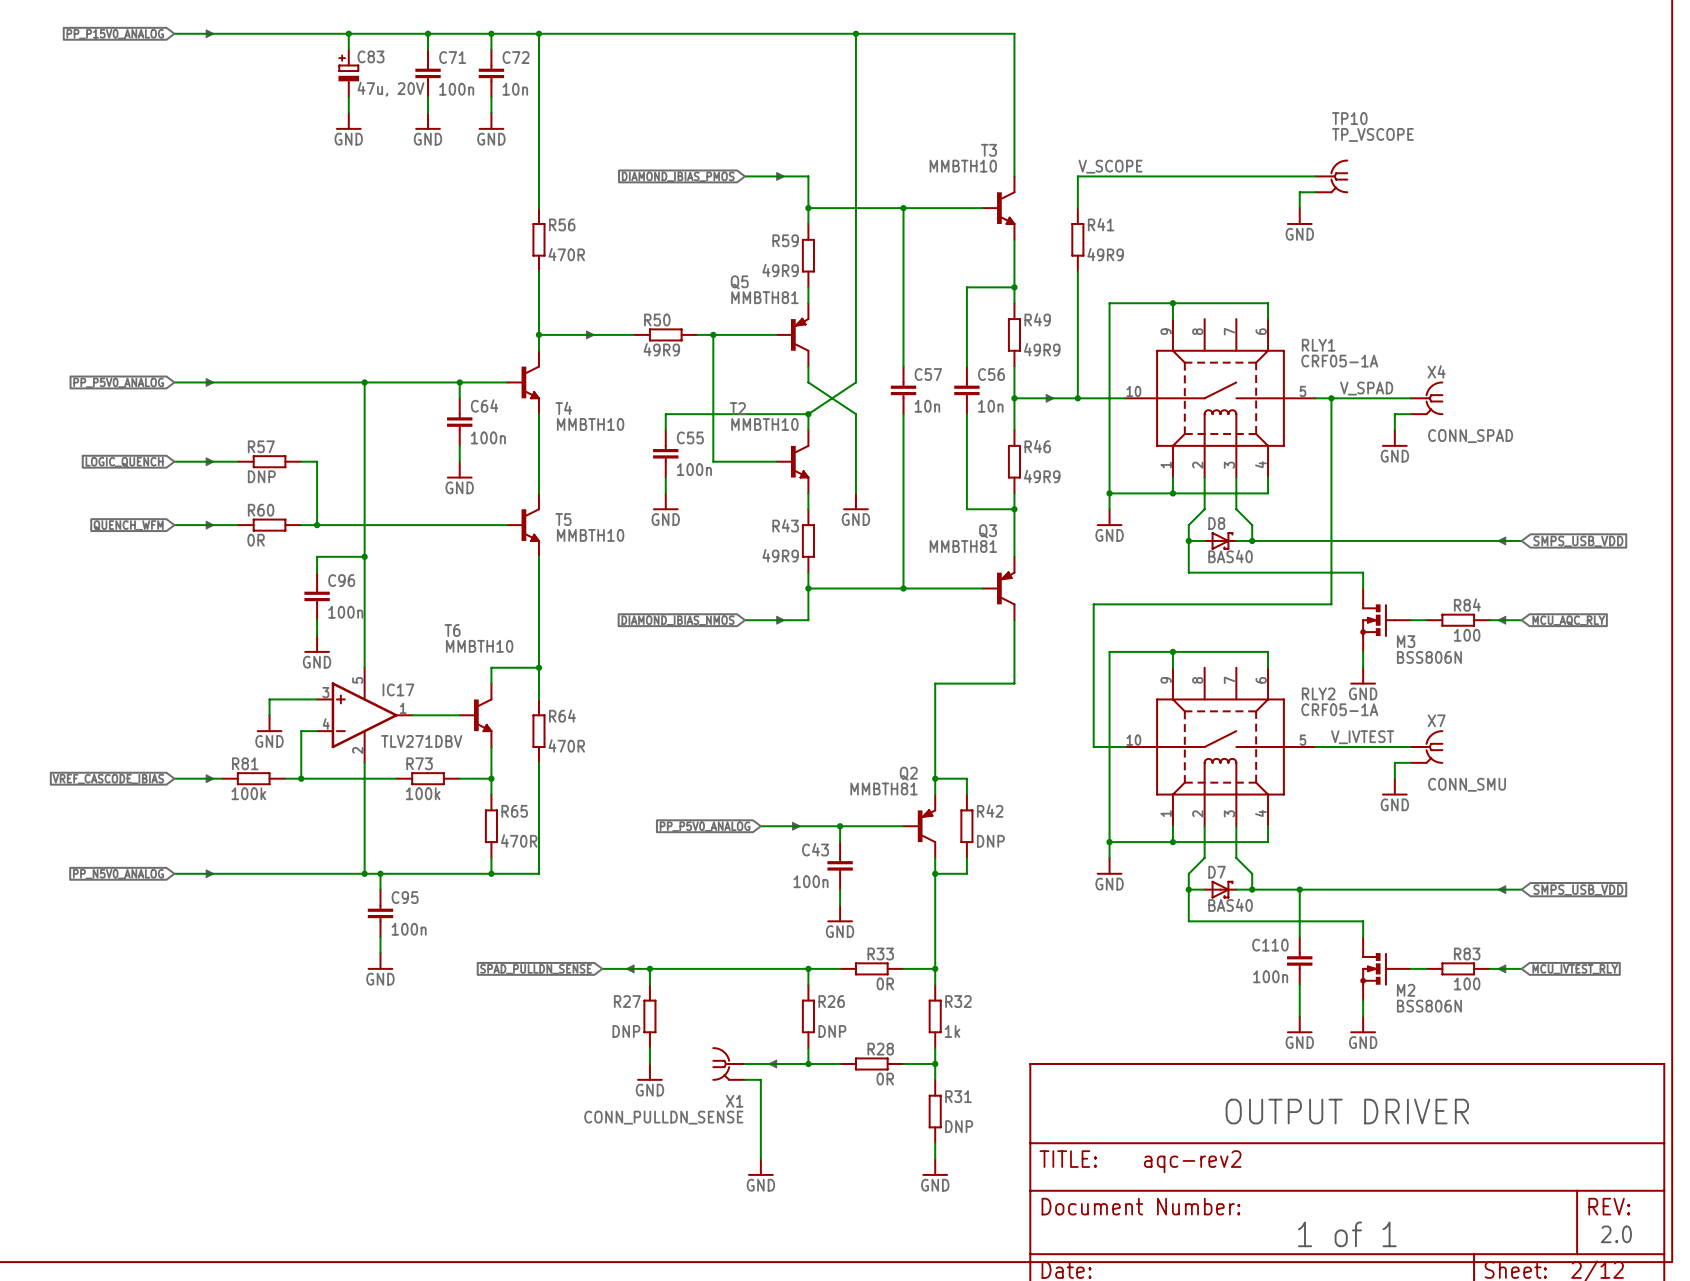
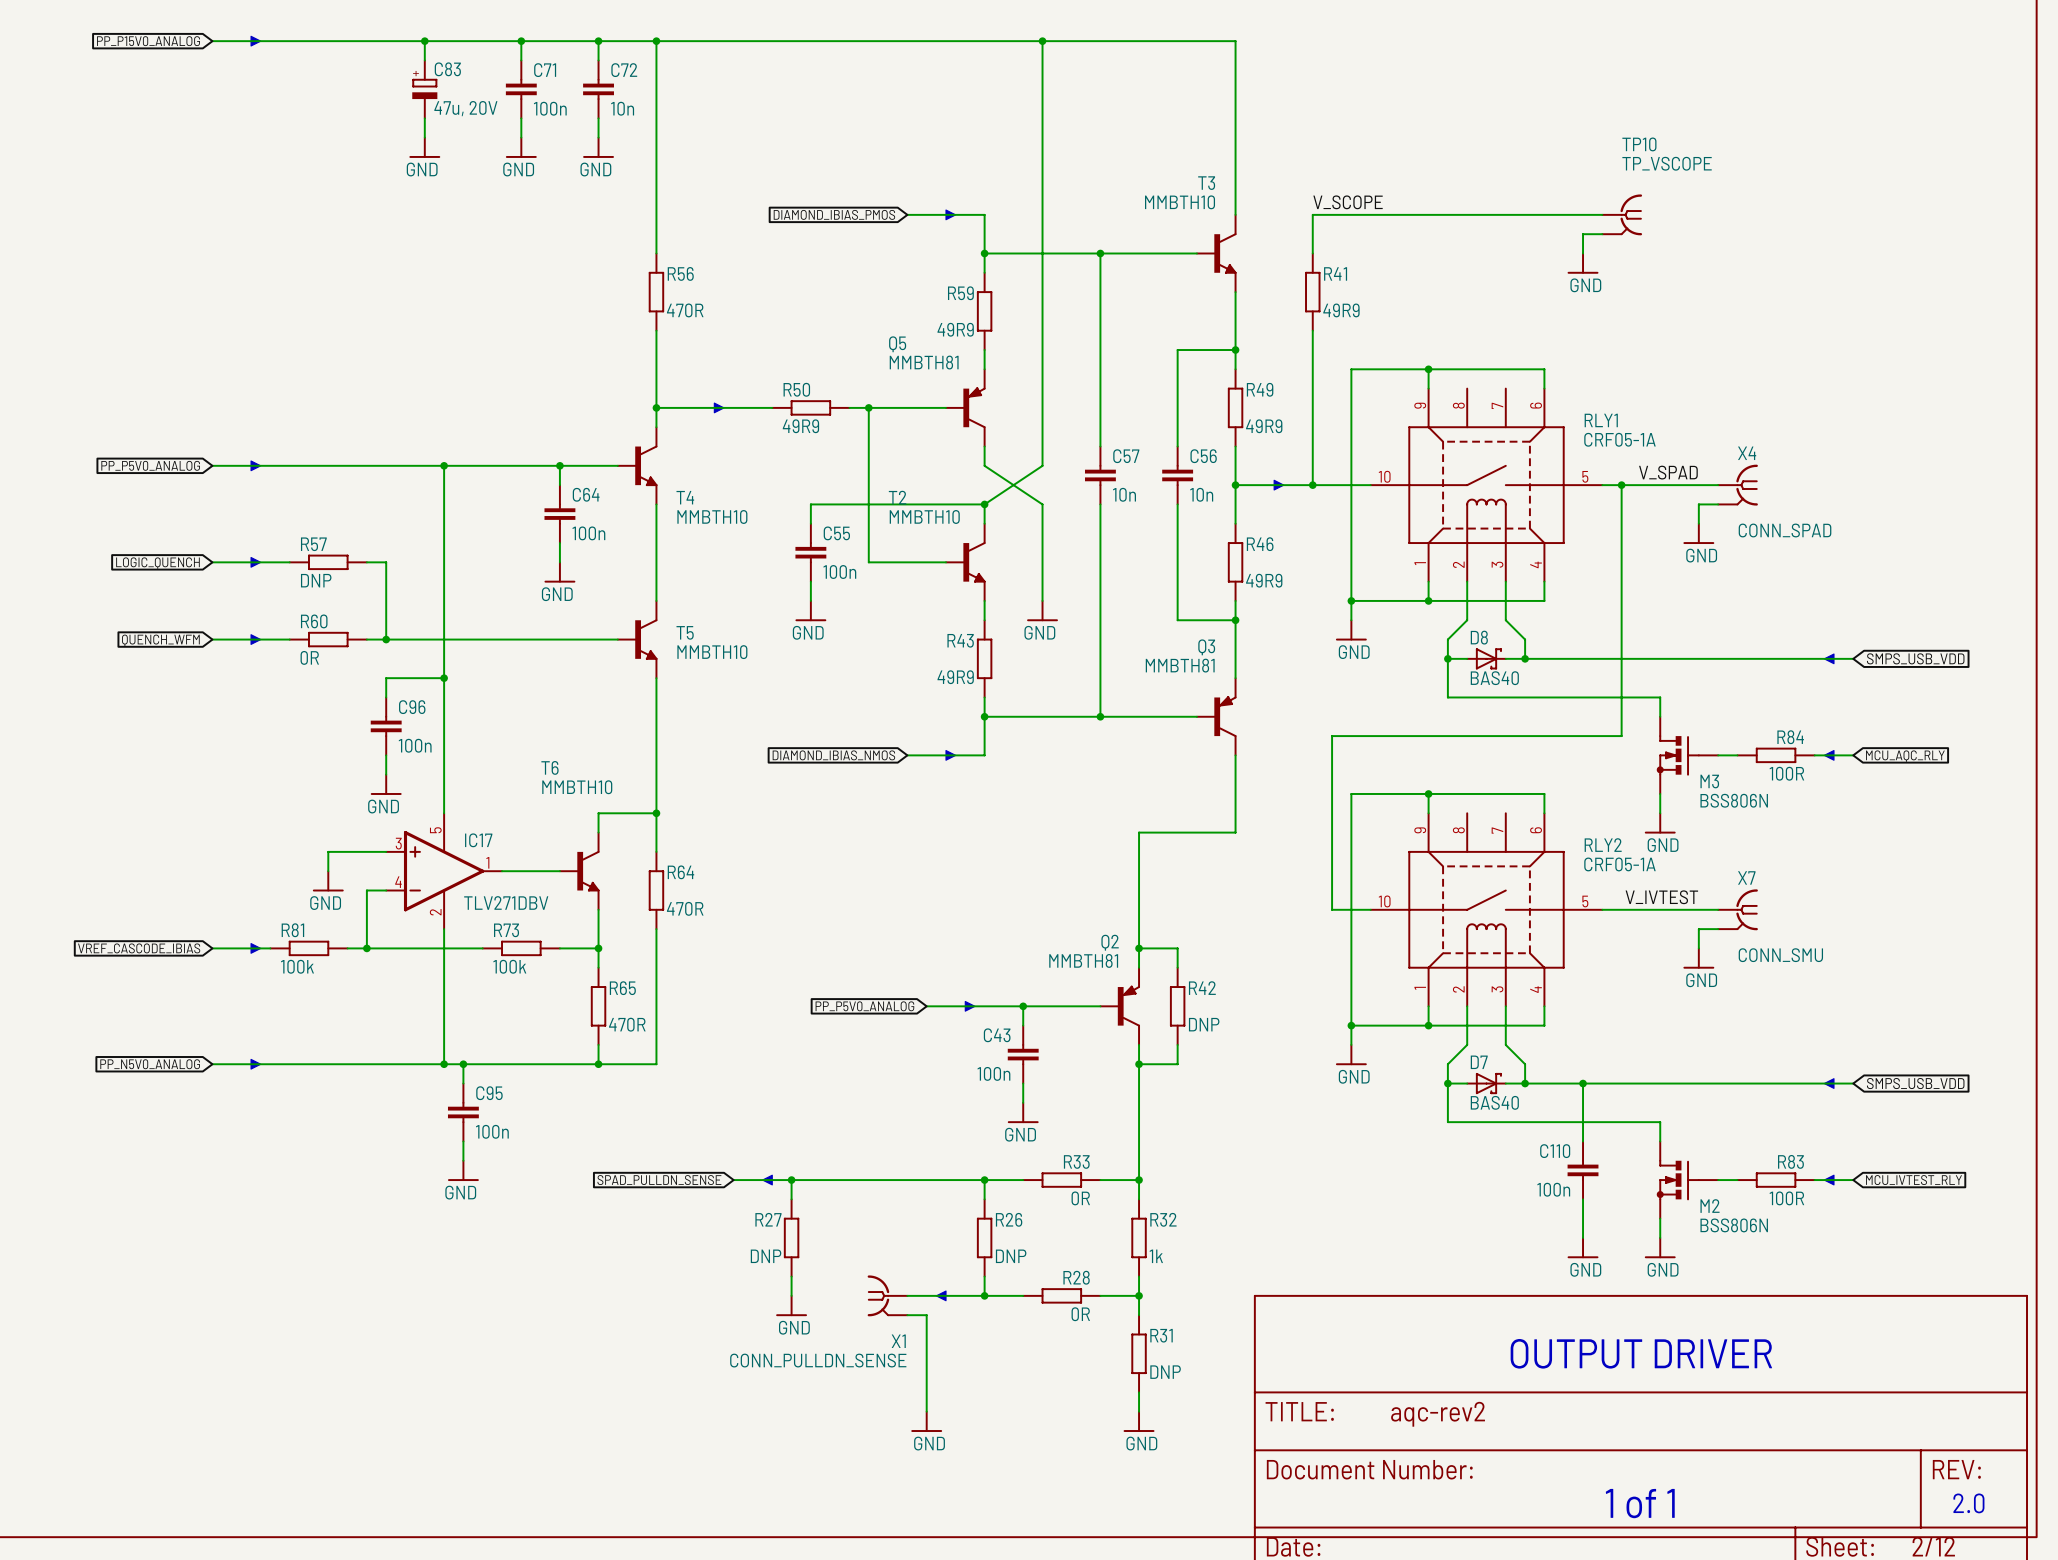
R84 value: 100 (1467, 635) -> 100R (1786, 773)
R83 value: 100 (1467, 983) -> 100R (1786, 1198)

